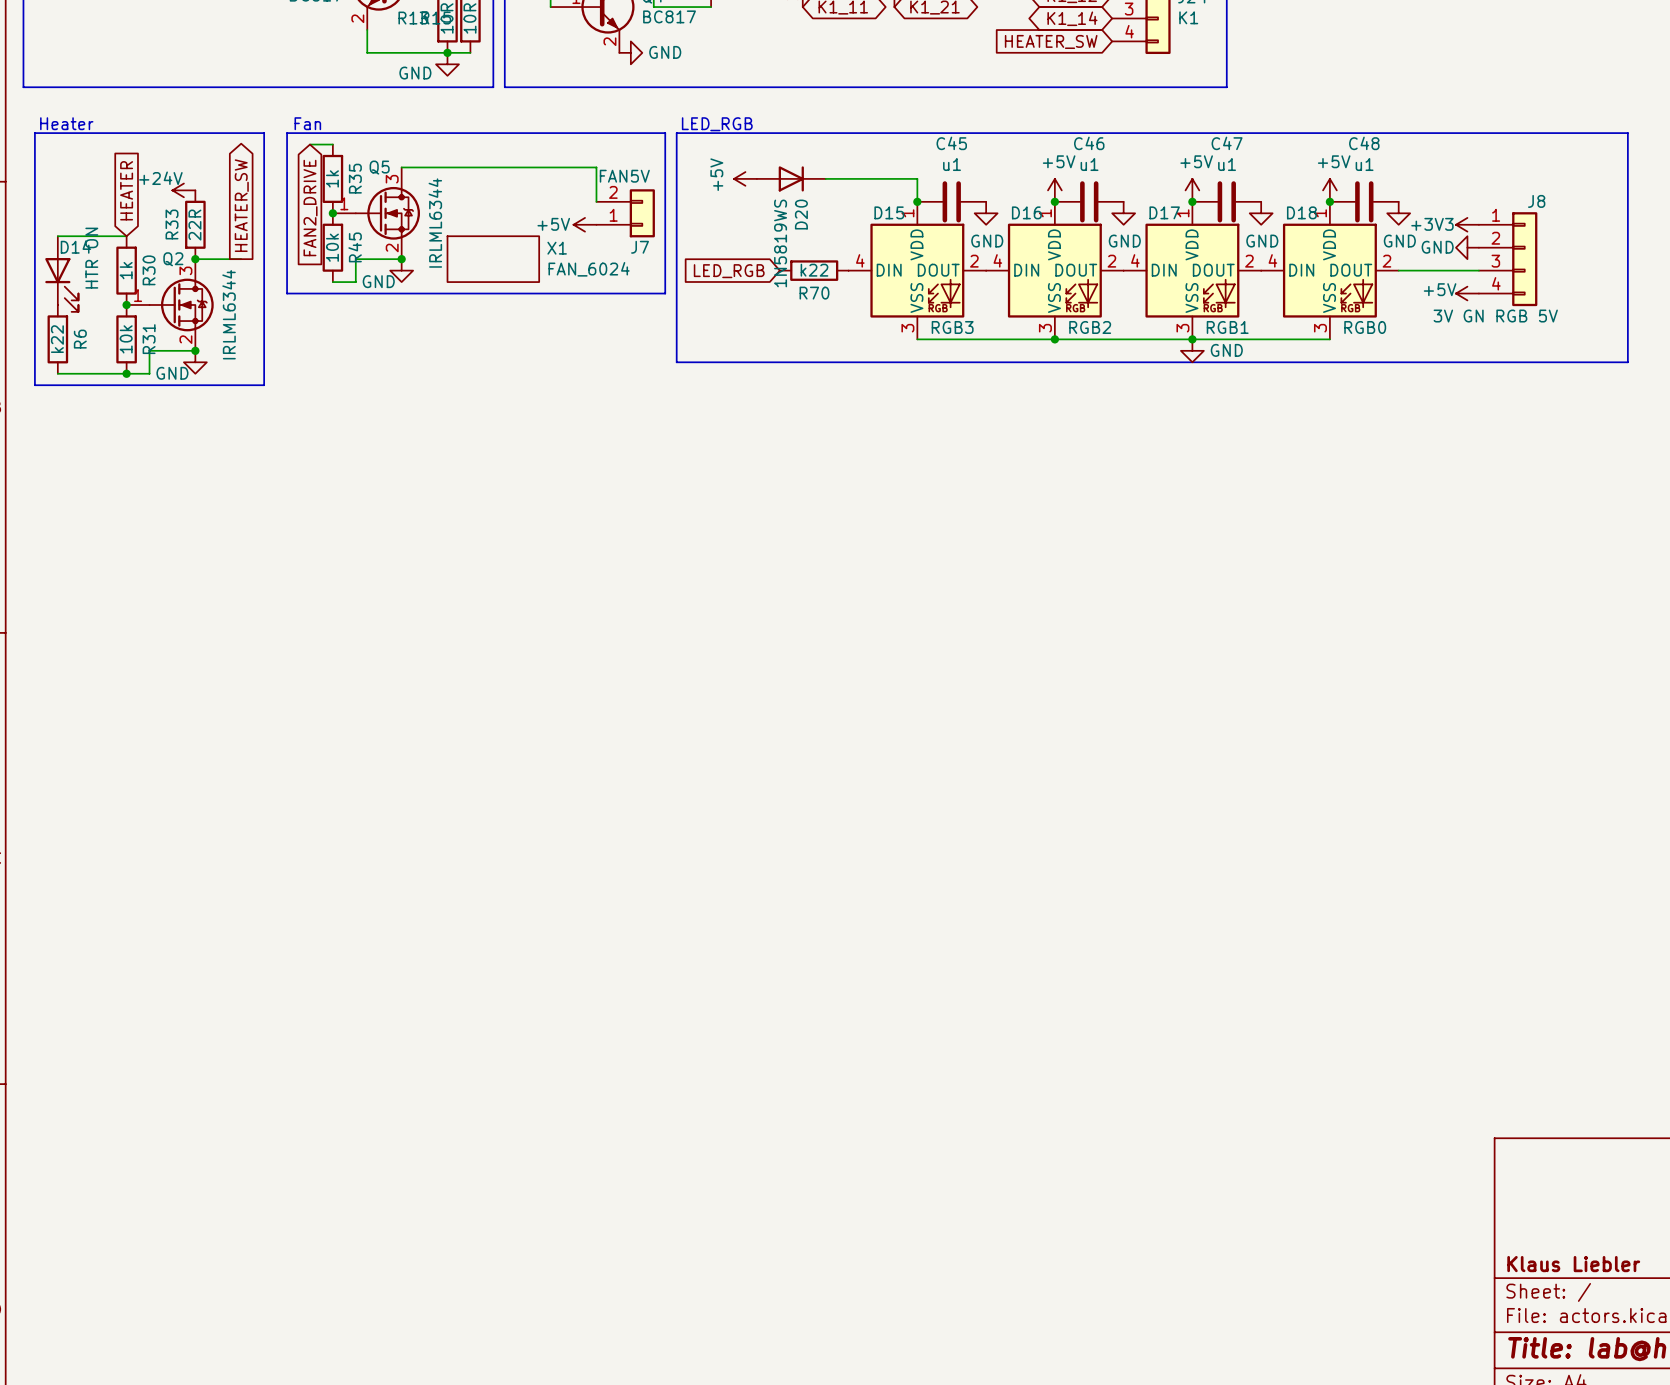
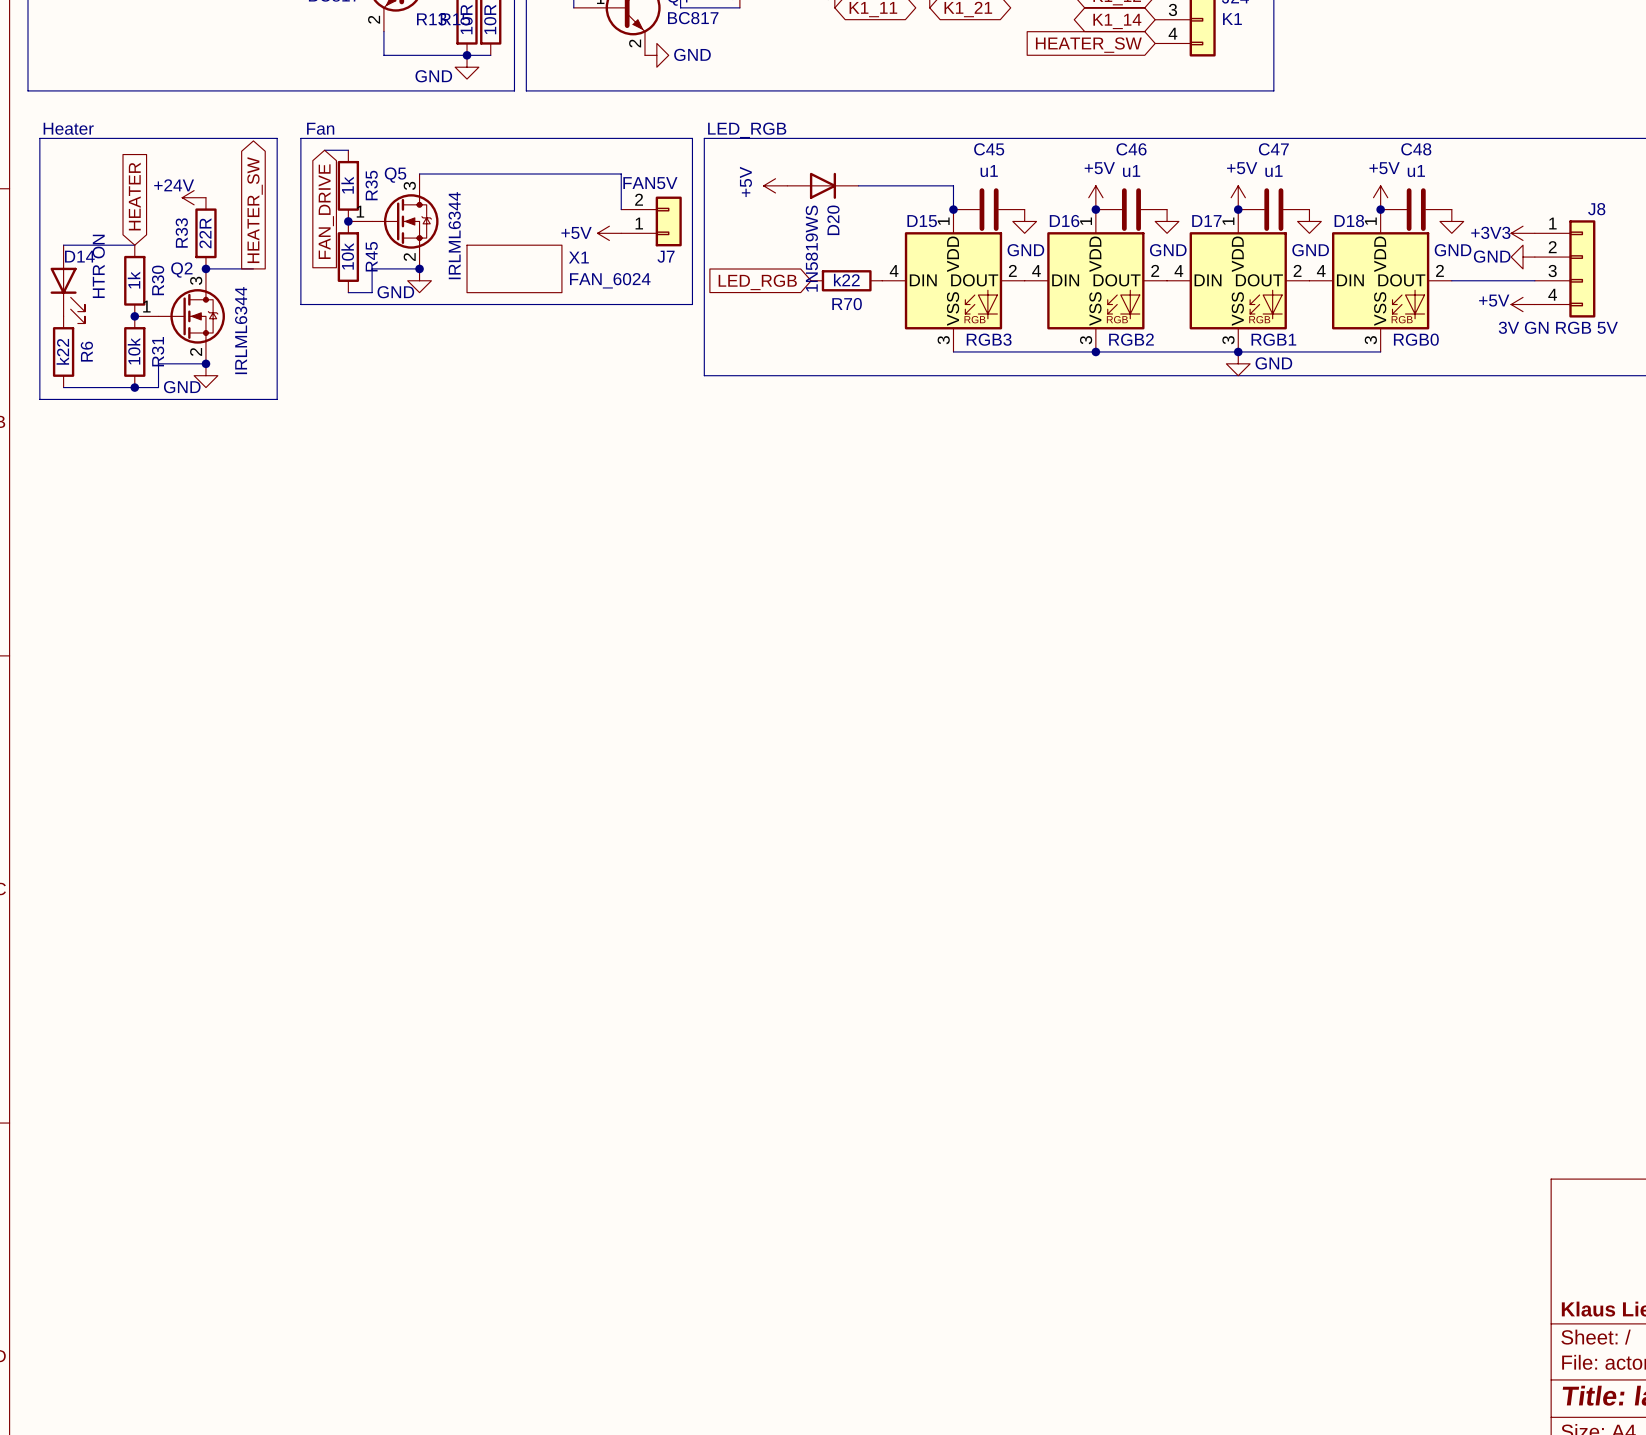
global label: FAN2_DRIVE (310, 208) -> FAN_DRIVE (326, 211)

